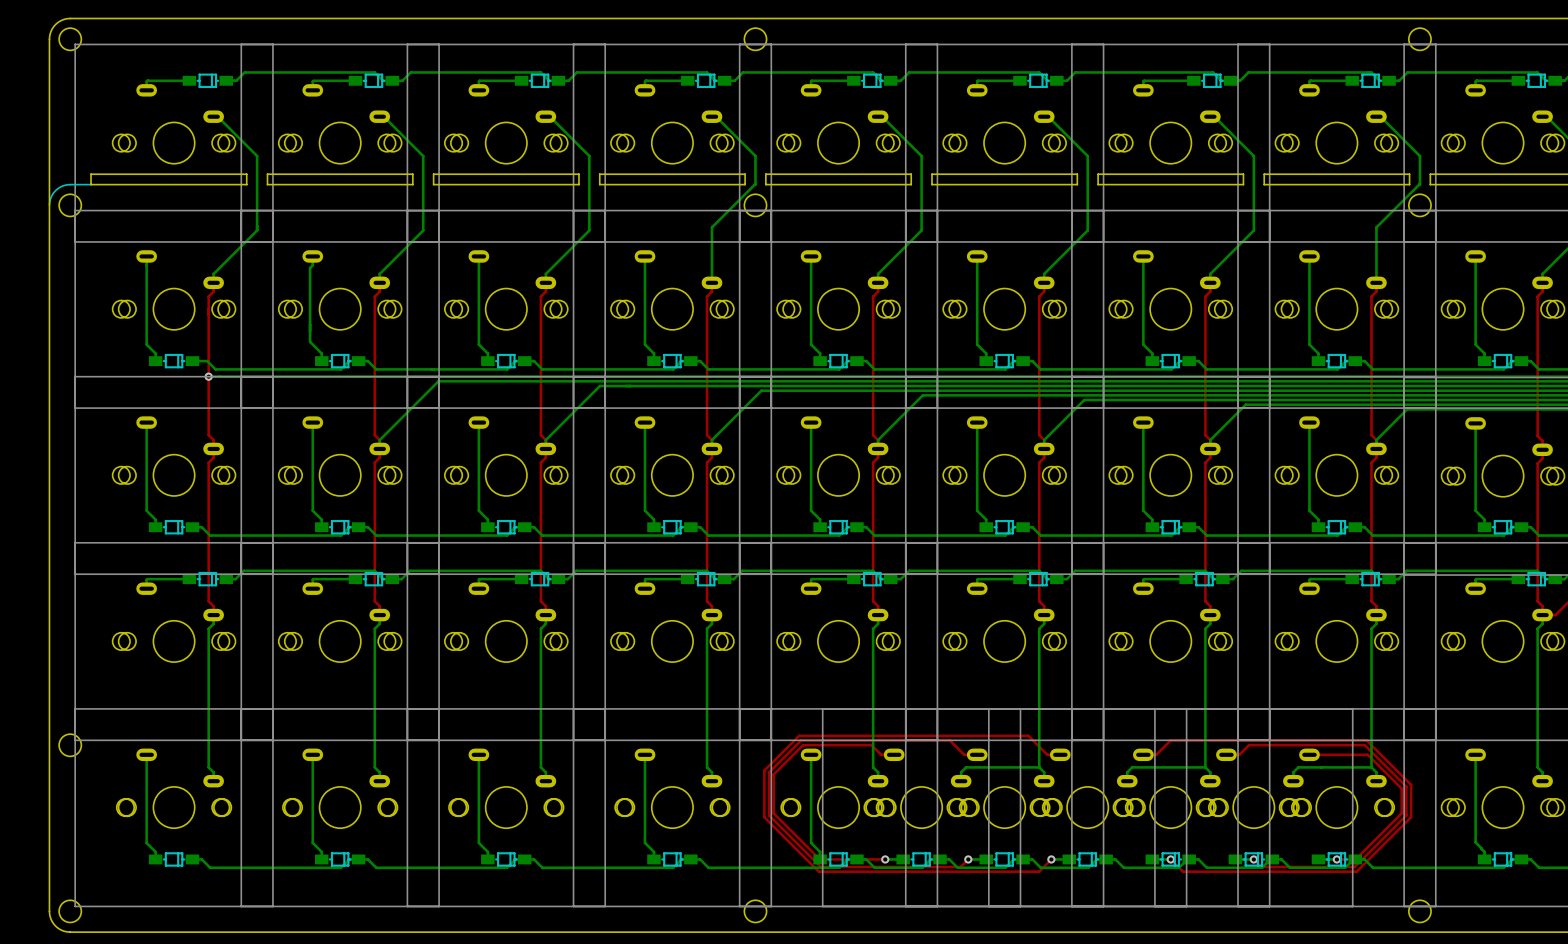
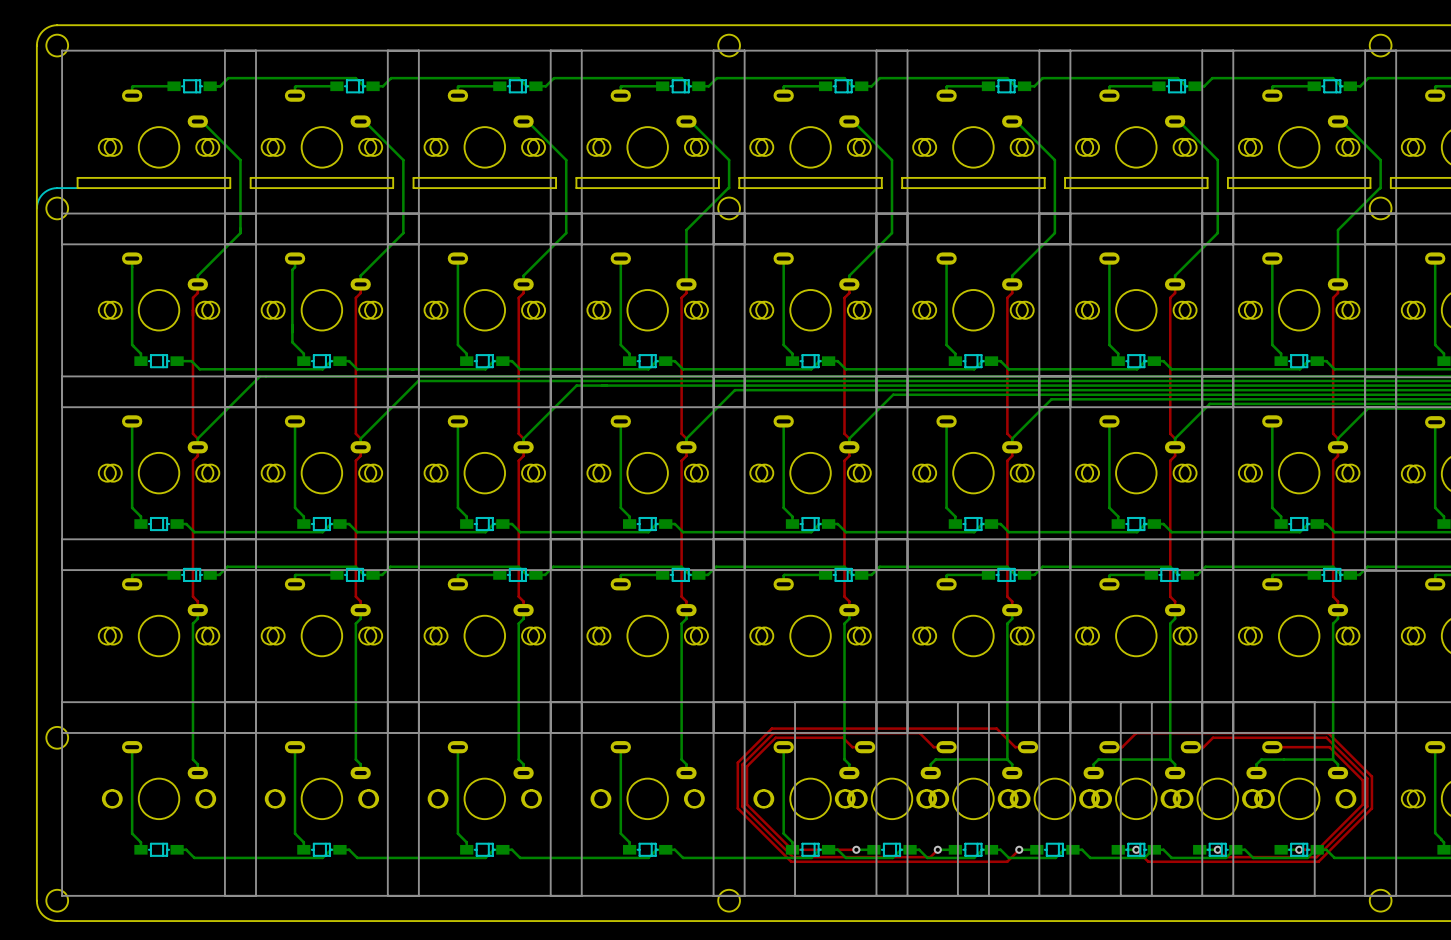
via: (208, 376) -> none
bottom track: (277, 376) (208, 376) -> (260, 376) (197, 438) (197, 447)

